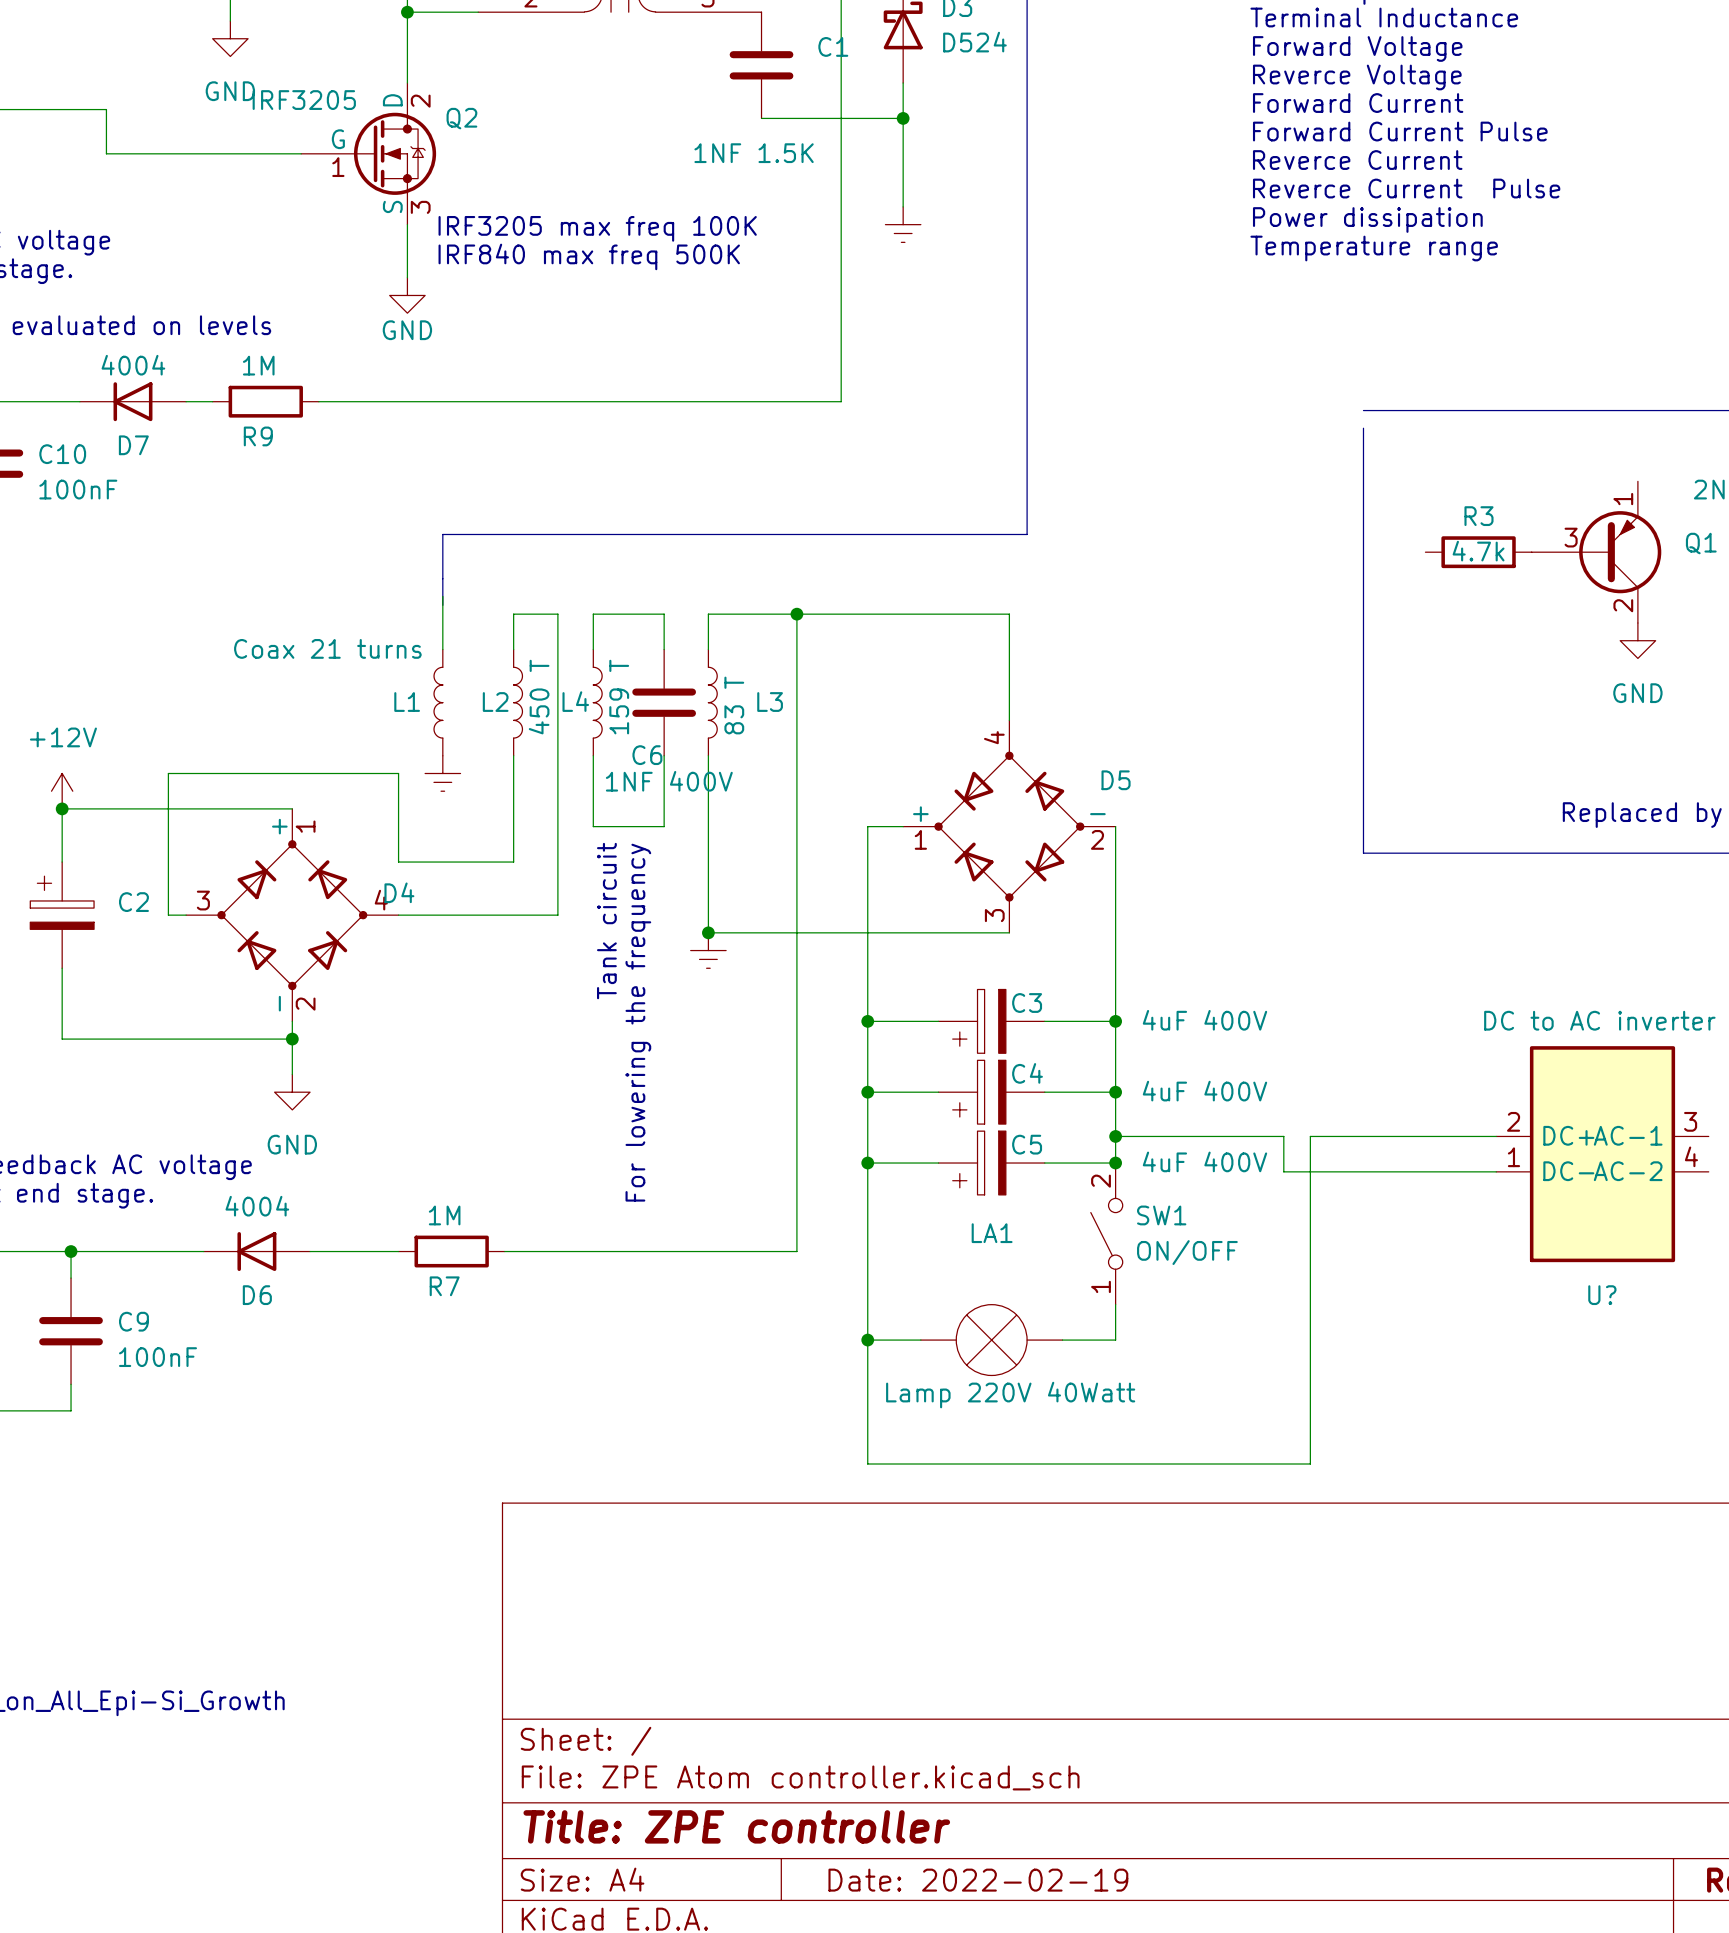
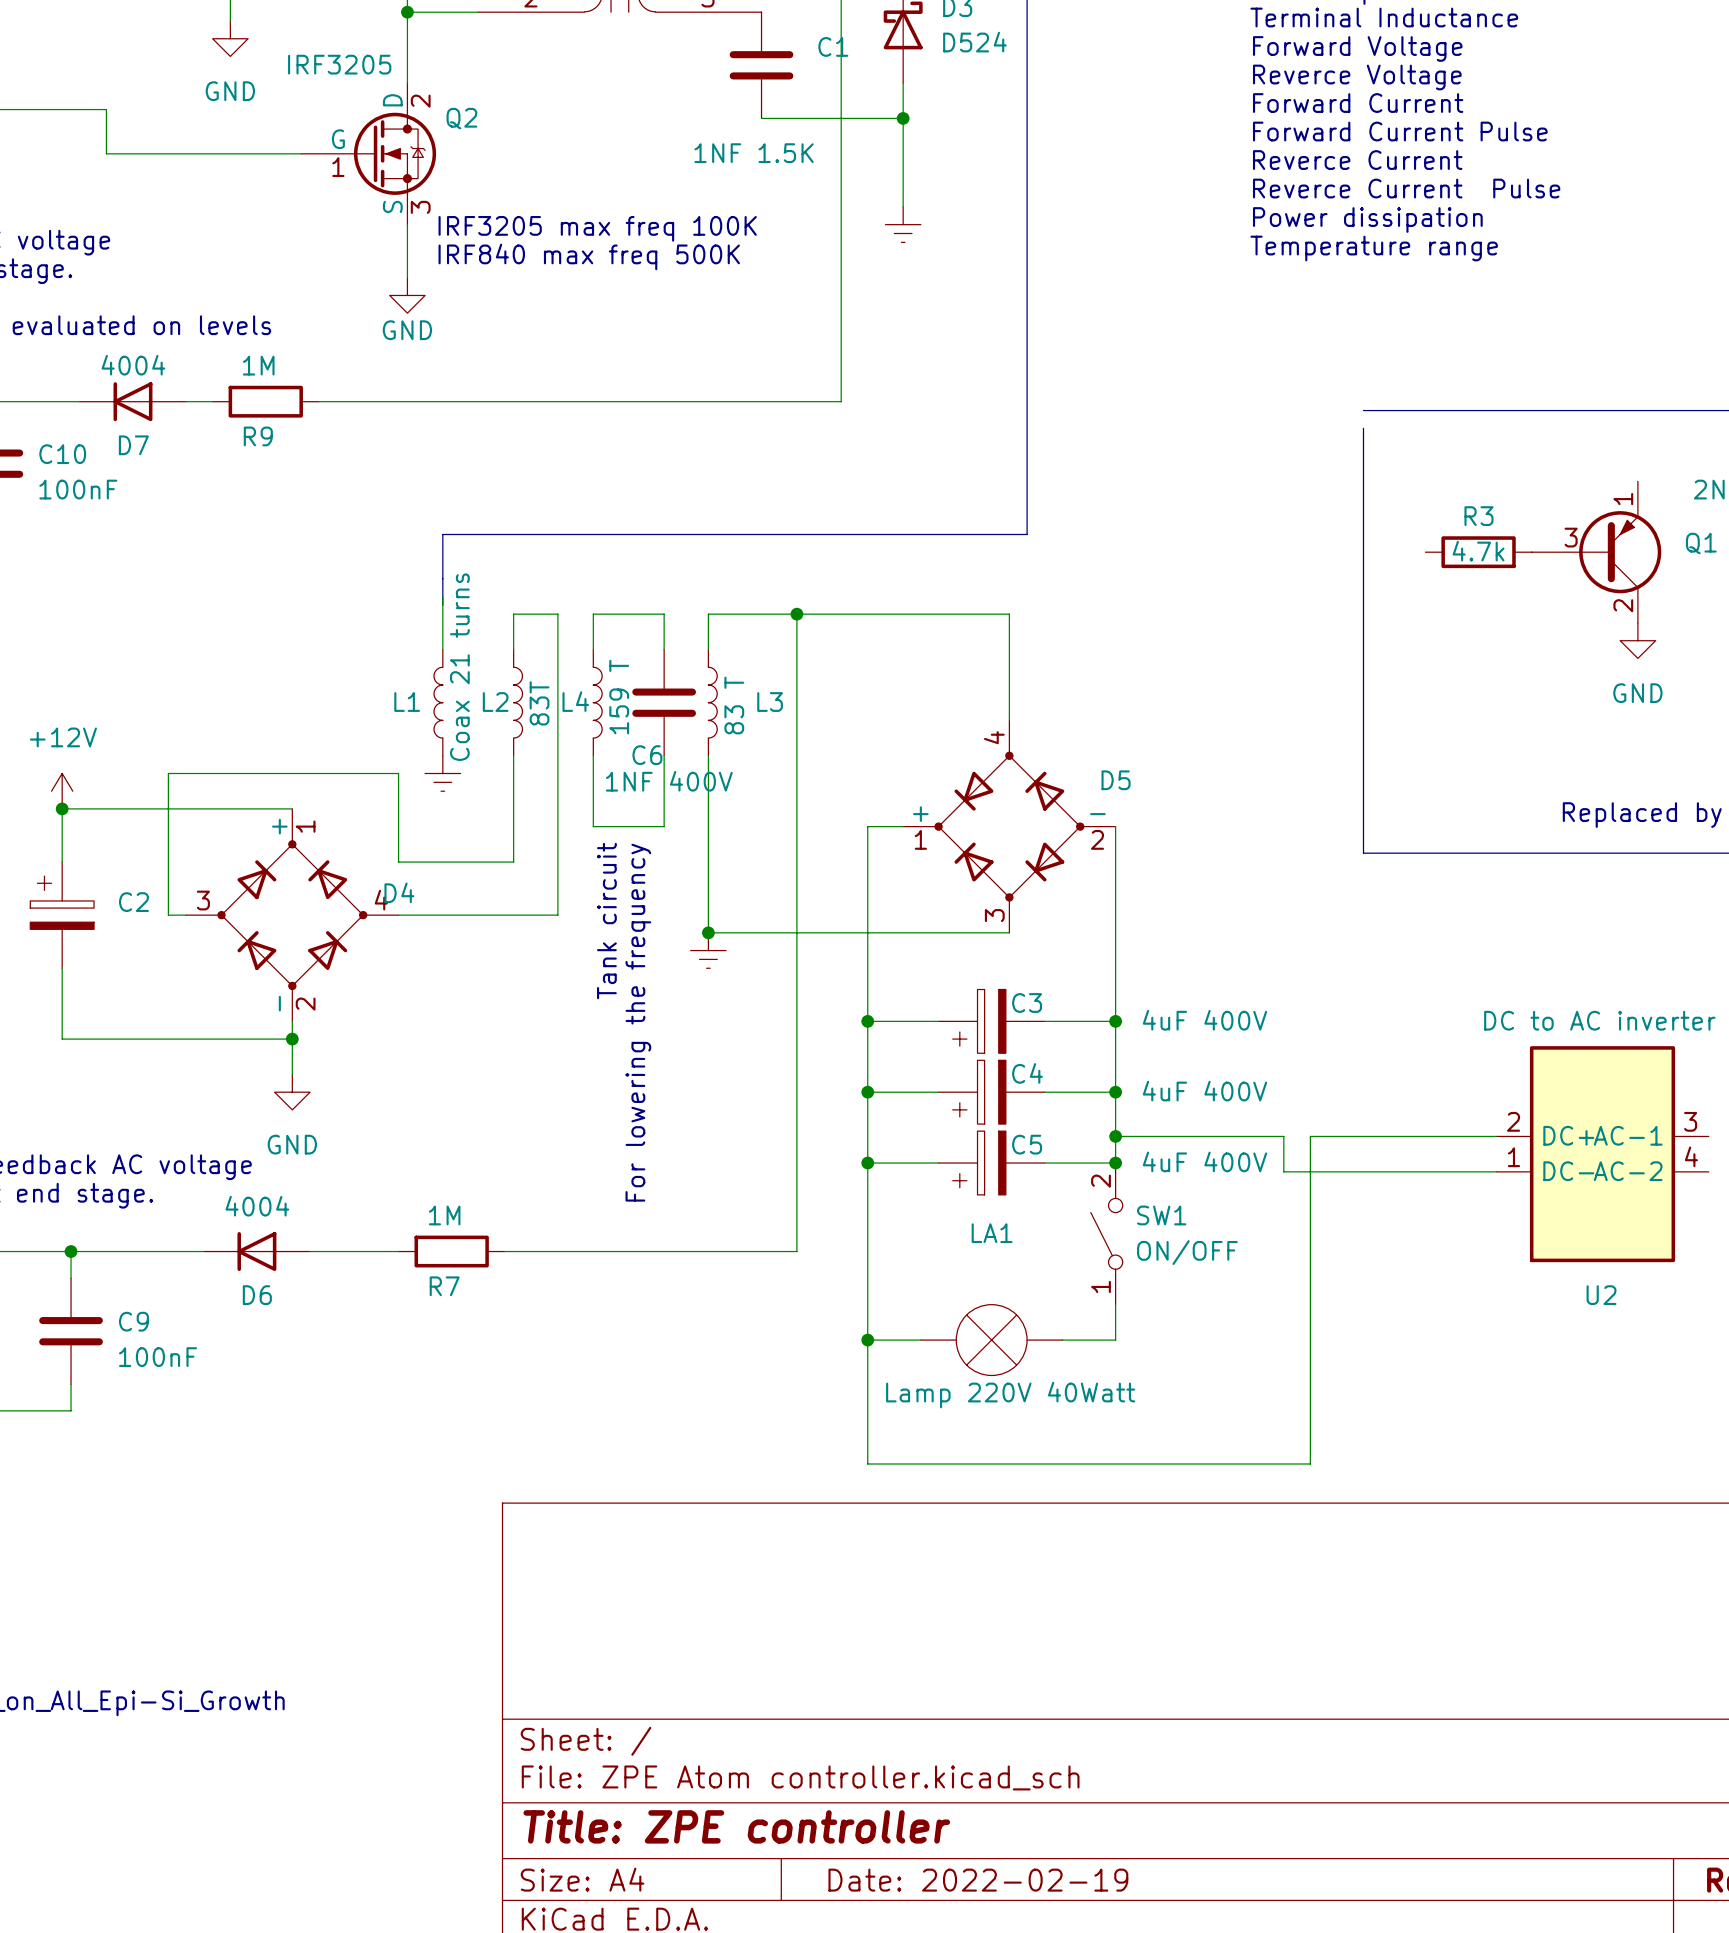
Q2 value position: IRF3205 (304, 100) -> IRF3205 (339, 64)
L1 value rotation: 0° (327, 648) -> 90° counterclockwise (459, 667)
L2 value: 450 T (539, 697) -> 83T (539, 703)
U? name: U? (1602, 1295) -> U2 (1601, 1295)

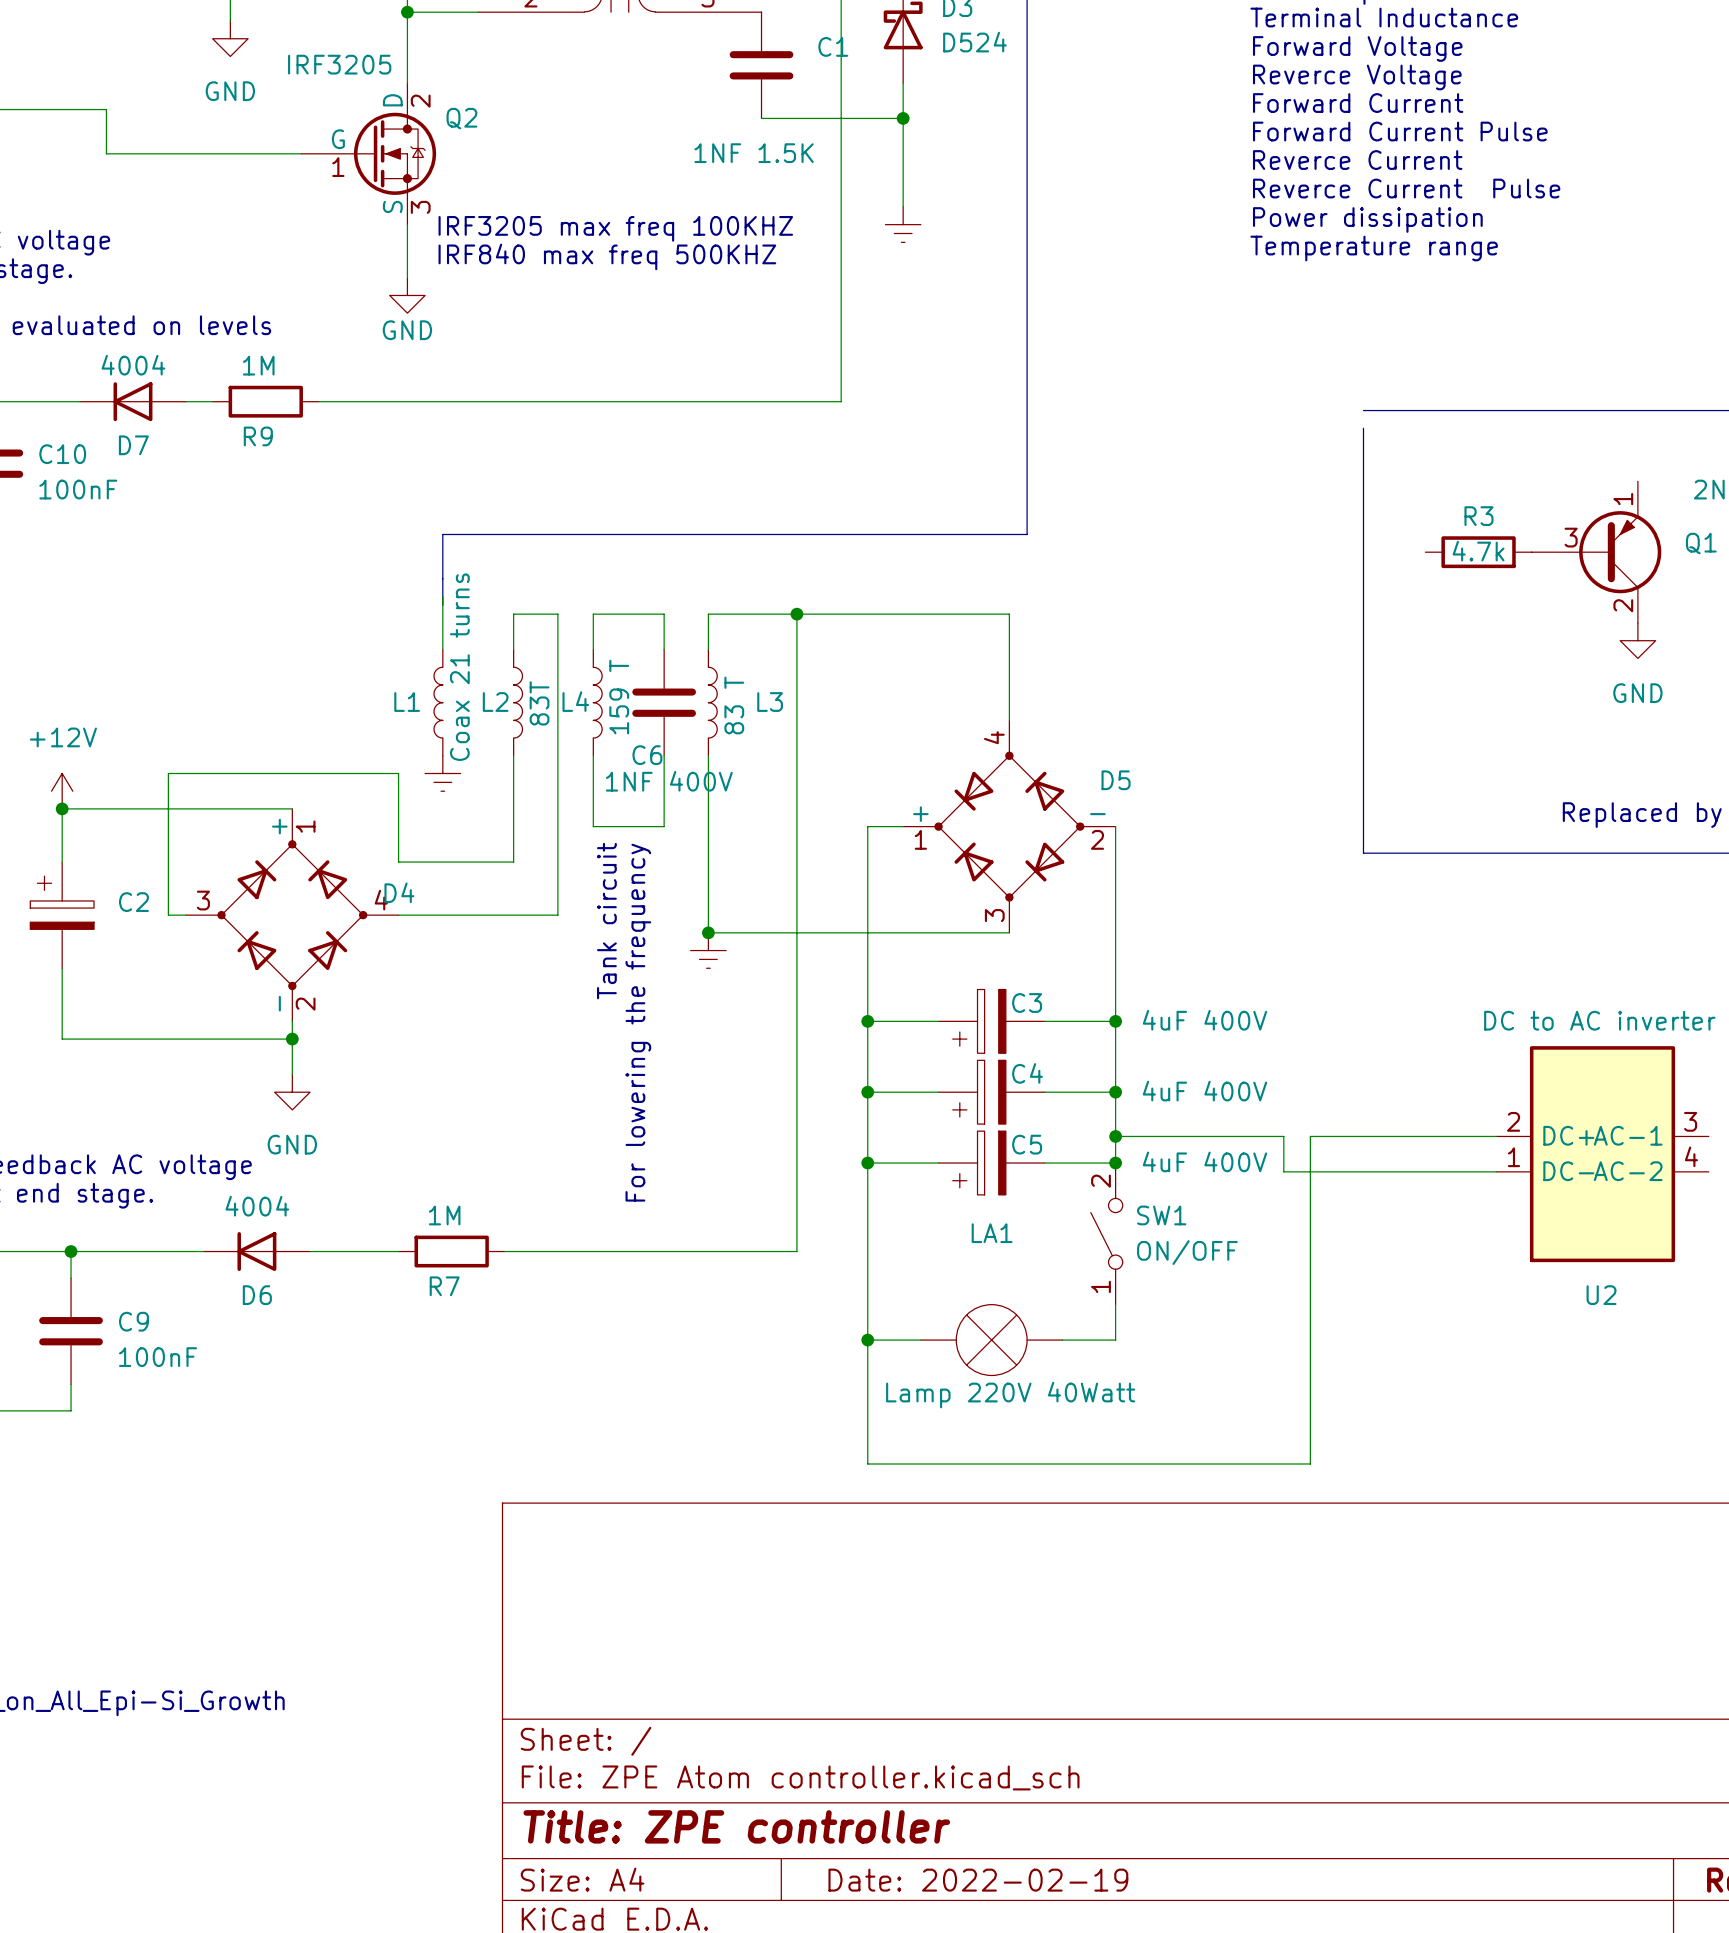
text: IRF3205 max freq 100K (597, 228) -> IRF3205 max freq 100KHZ (615, 228)
text: IRF840 max freq 500K (589, 256) -> IRF840 max freq 500KHZ (607, 256)

